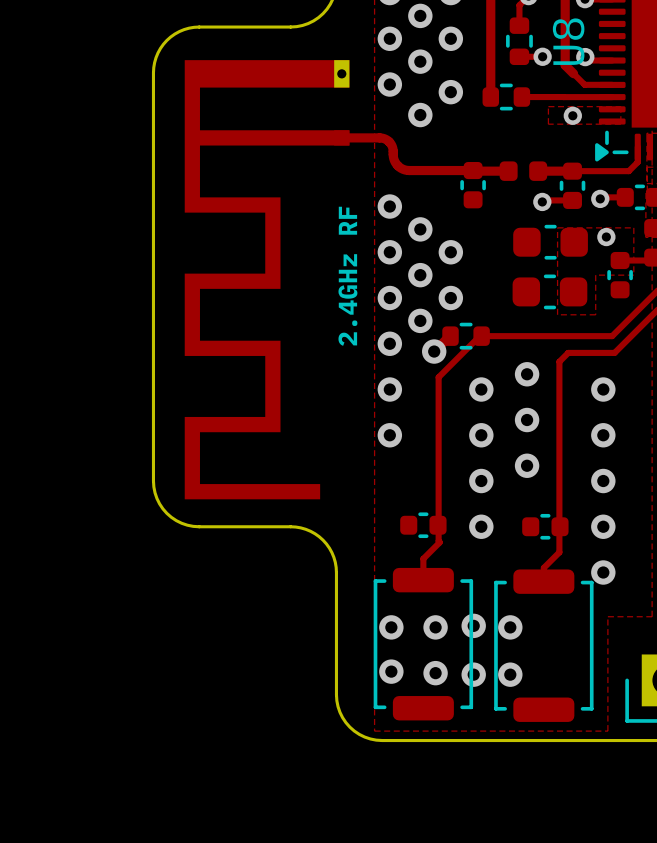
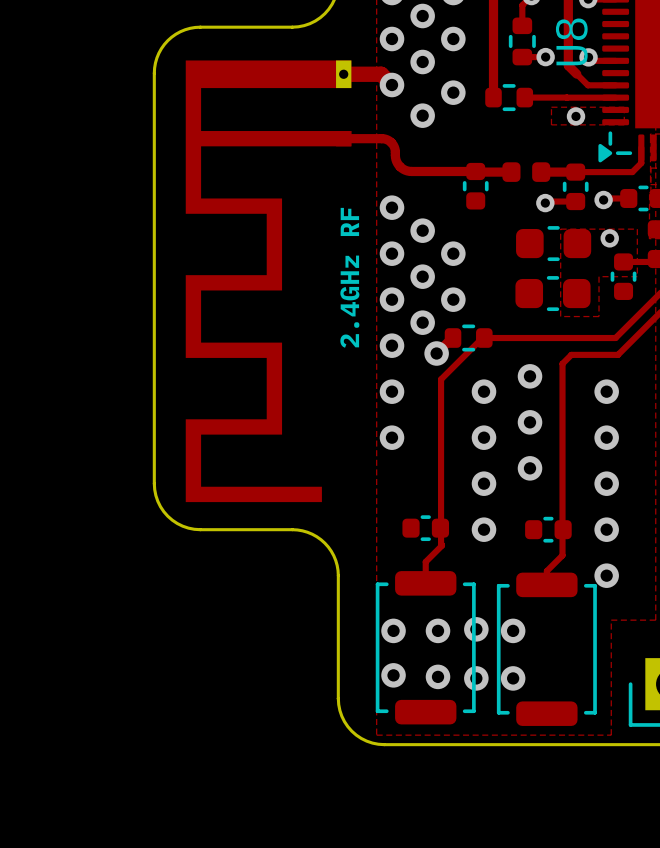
track: none -> (343, 74) (381, 74) (392, 85)

